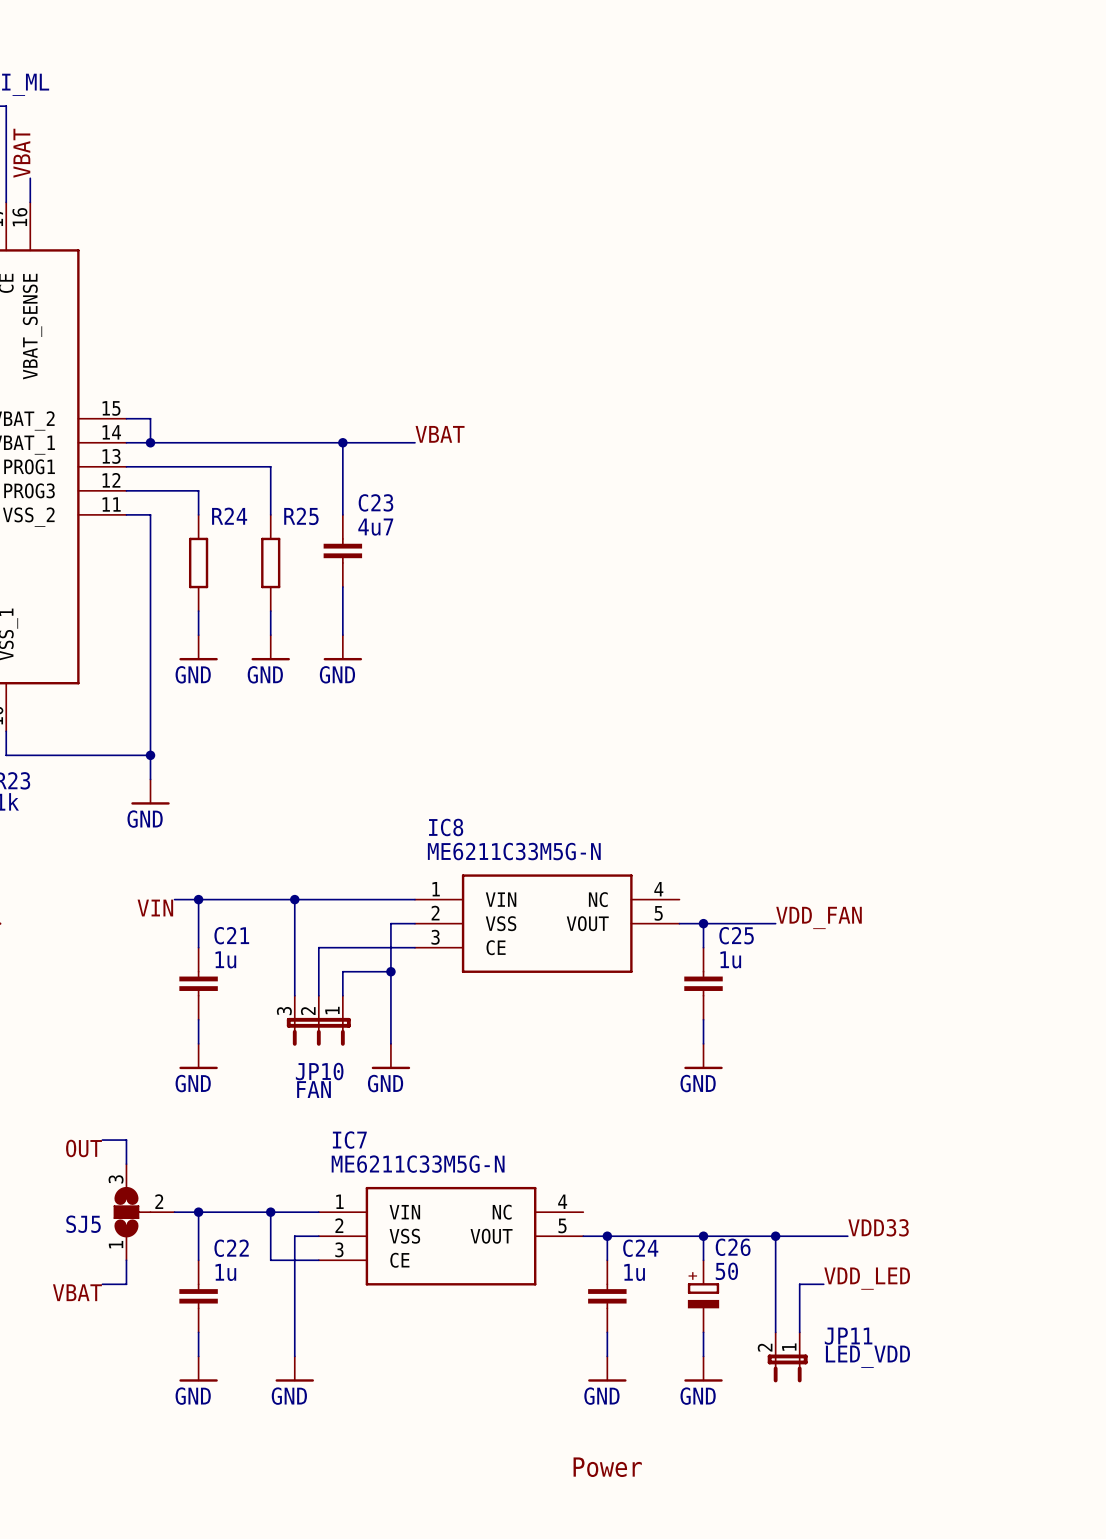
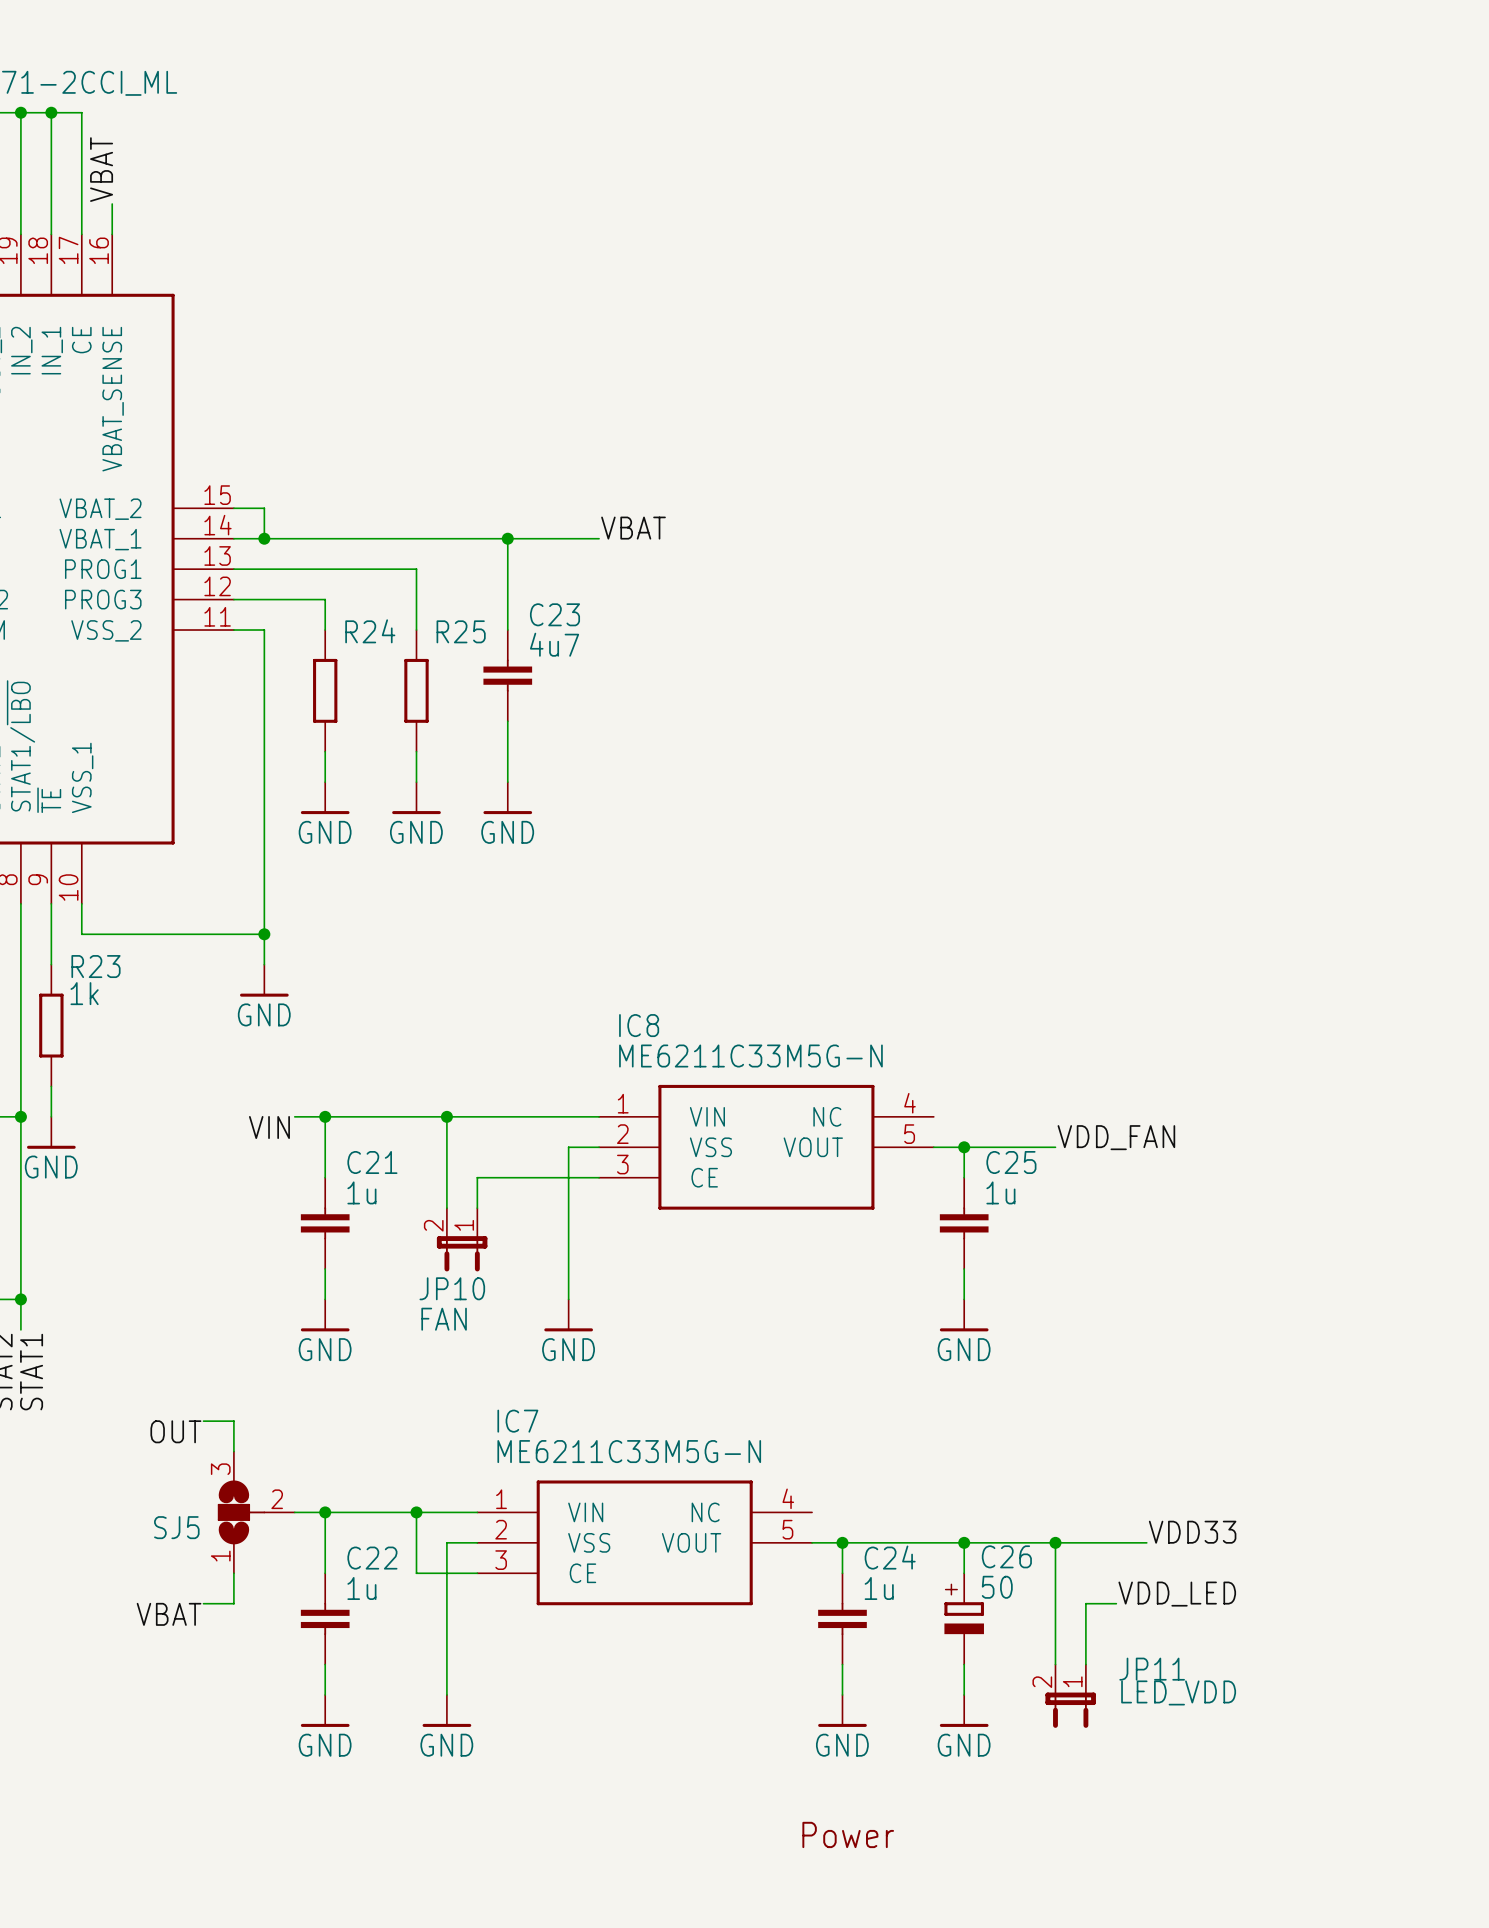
wire: (390, 971) (342, 971) (342, 995) -> none
junction: (390, 971) -> none
JP10 symbol: [286, 995, 351, 1046] -> [436, 1208, 488, 1272]

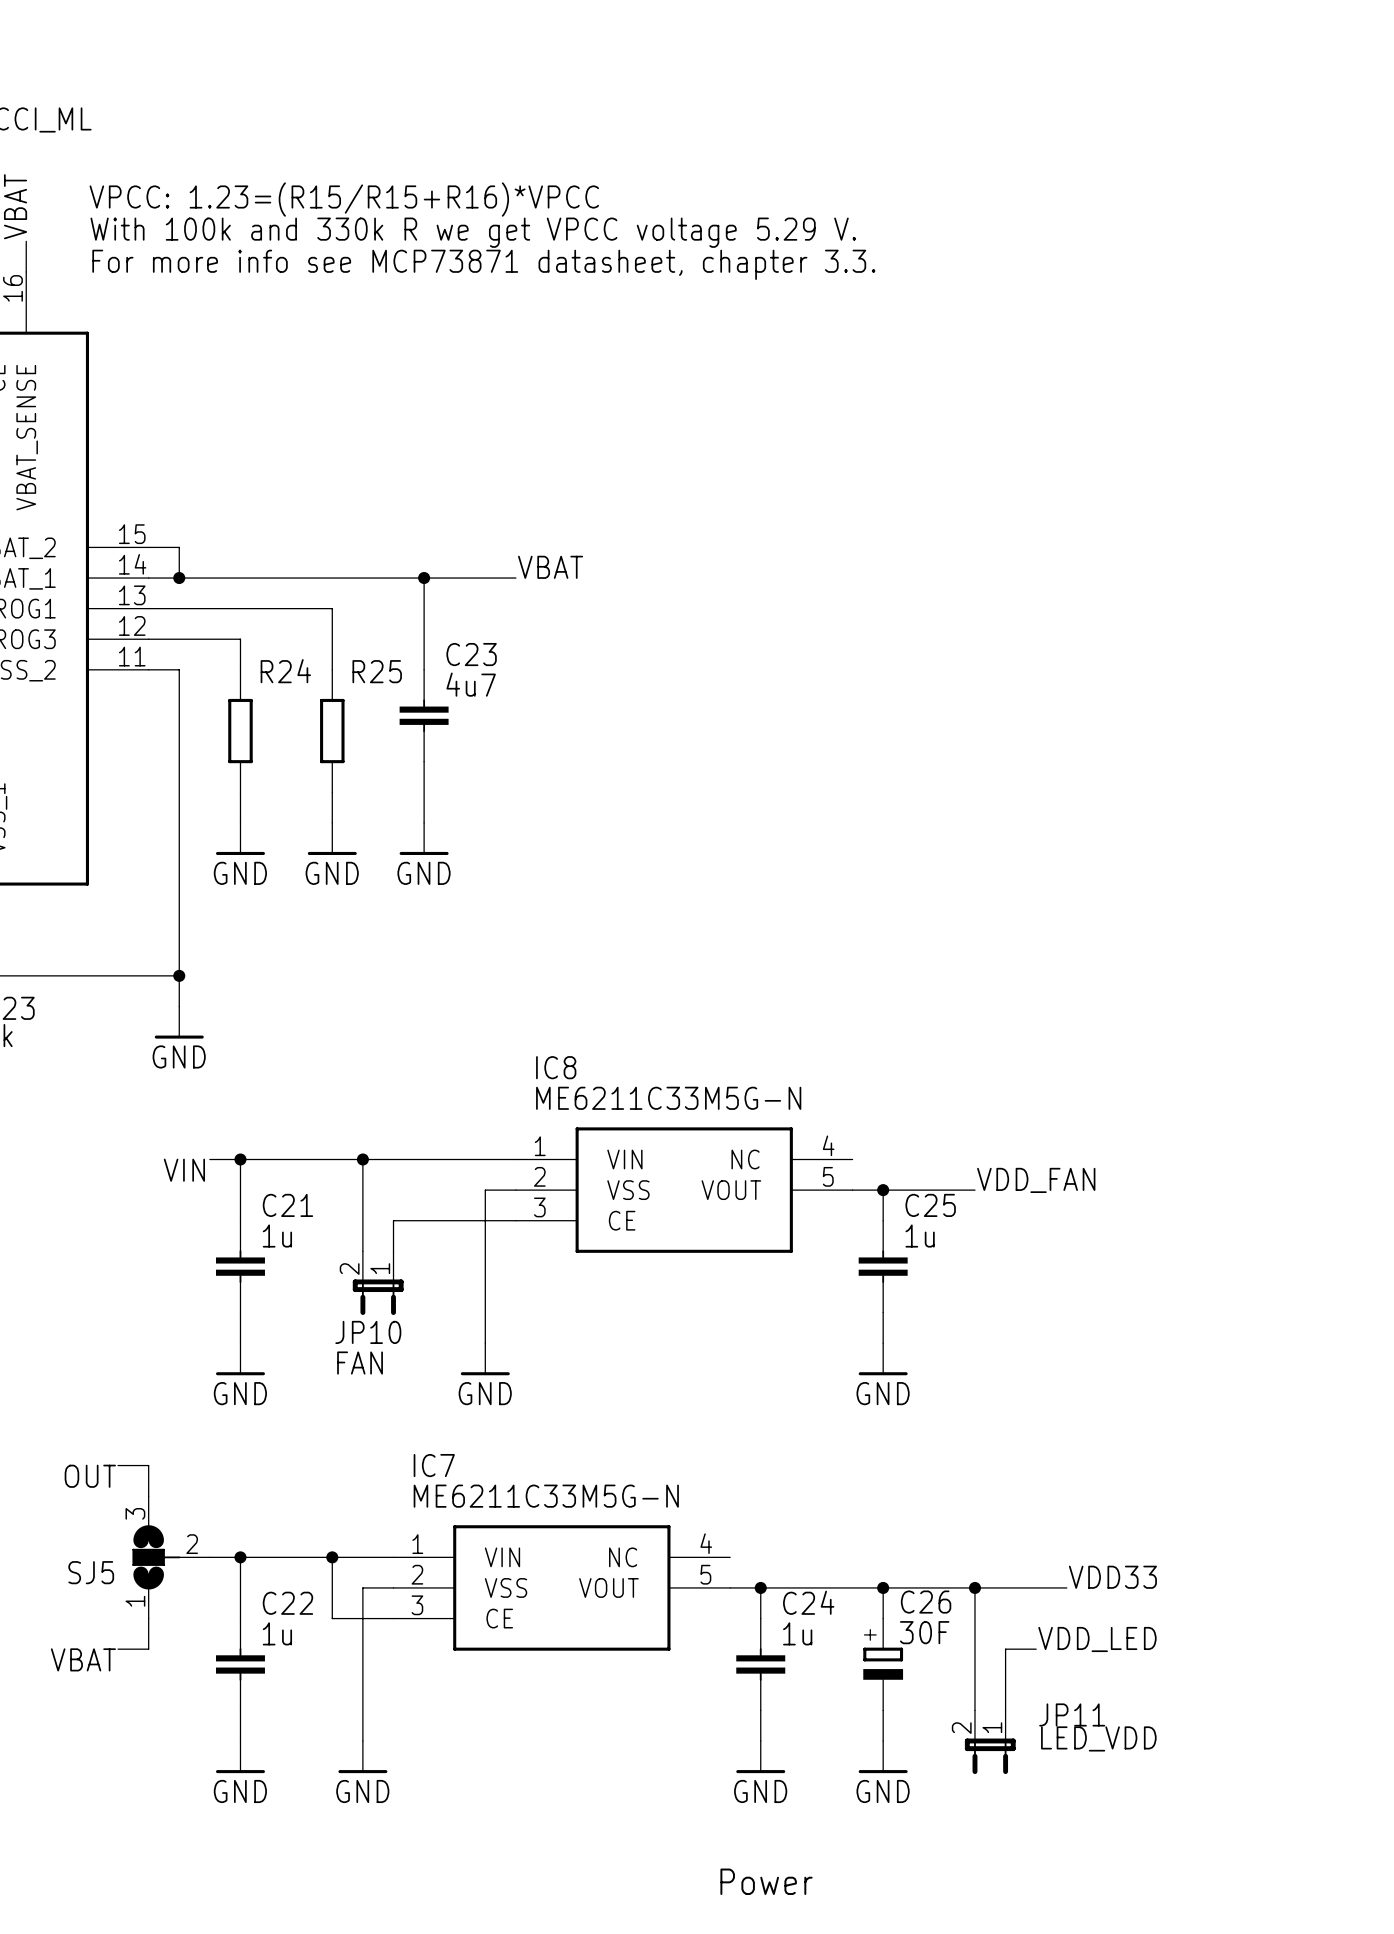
text: none -> VPCC: 1.23=(R15/R15+R16)*VPCC (344, 199)
text: none -> With 100k and 330k R we get VPCC voltage 5.29 V. (473, 232)
text: none -> For more info see MCP73871 datasheet, chapter 3.3. (483, 264)
C26 value: 50 (997, 1587) -> 30F (924, 1632)

